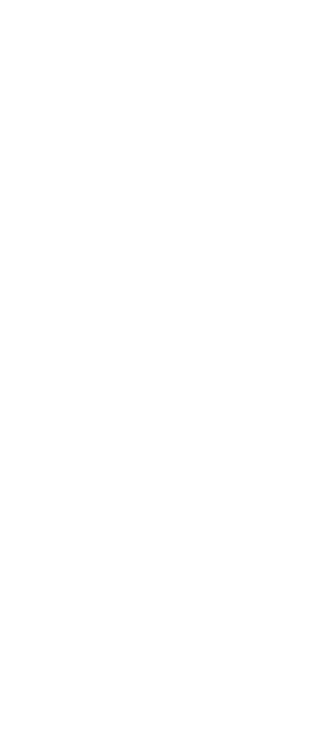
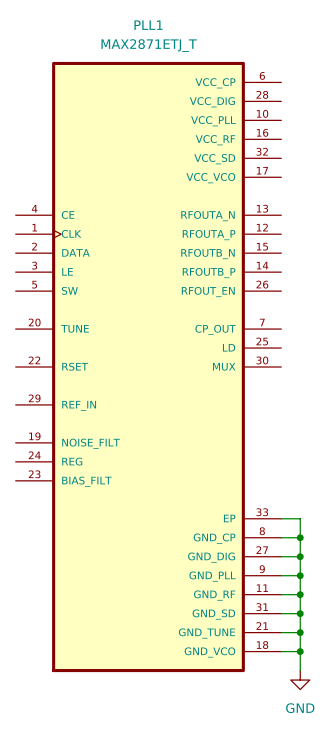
PLL1: none -> MAX2871ETJ_T (148, 367)
wire: none -> (281, 518) (300, 518) (300, 670)
wire: none -> (281, 537) (300, 537)
junction: none -> (300, 537)
wire: none -> (281, 556) (300, 556)
junction: none -> (300, 556)
wire: none -> (281, 575) (300, 575)
junction: none -> (300, 575)
wire: none -> (281, 594) (300, 594)
junction: none -> (300, 594)
wire: none -> (281, 613) (300, 613)
junction: none -> (300, 613)
wire: none -> (281, 632) (300, 632)
junction: none -> (300, 632)
wire: none -> (281, 651) (300, 651)
junction: none -> (300, 651)
power symbol: none -> GND (300, 680)

